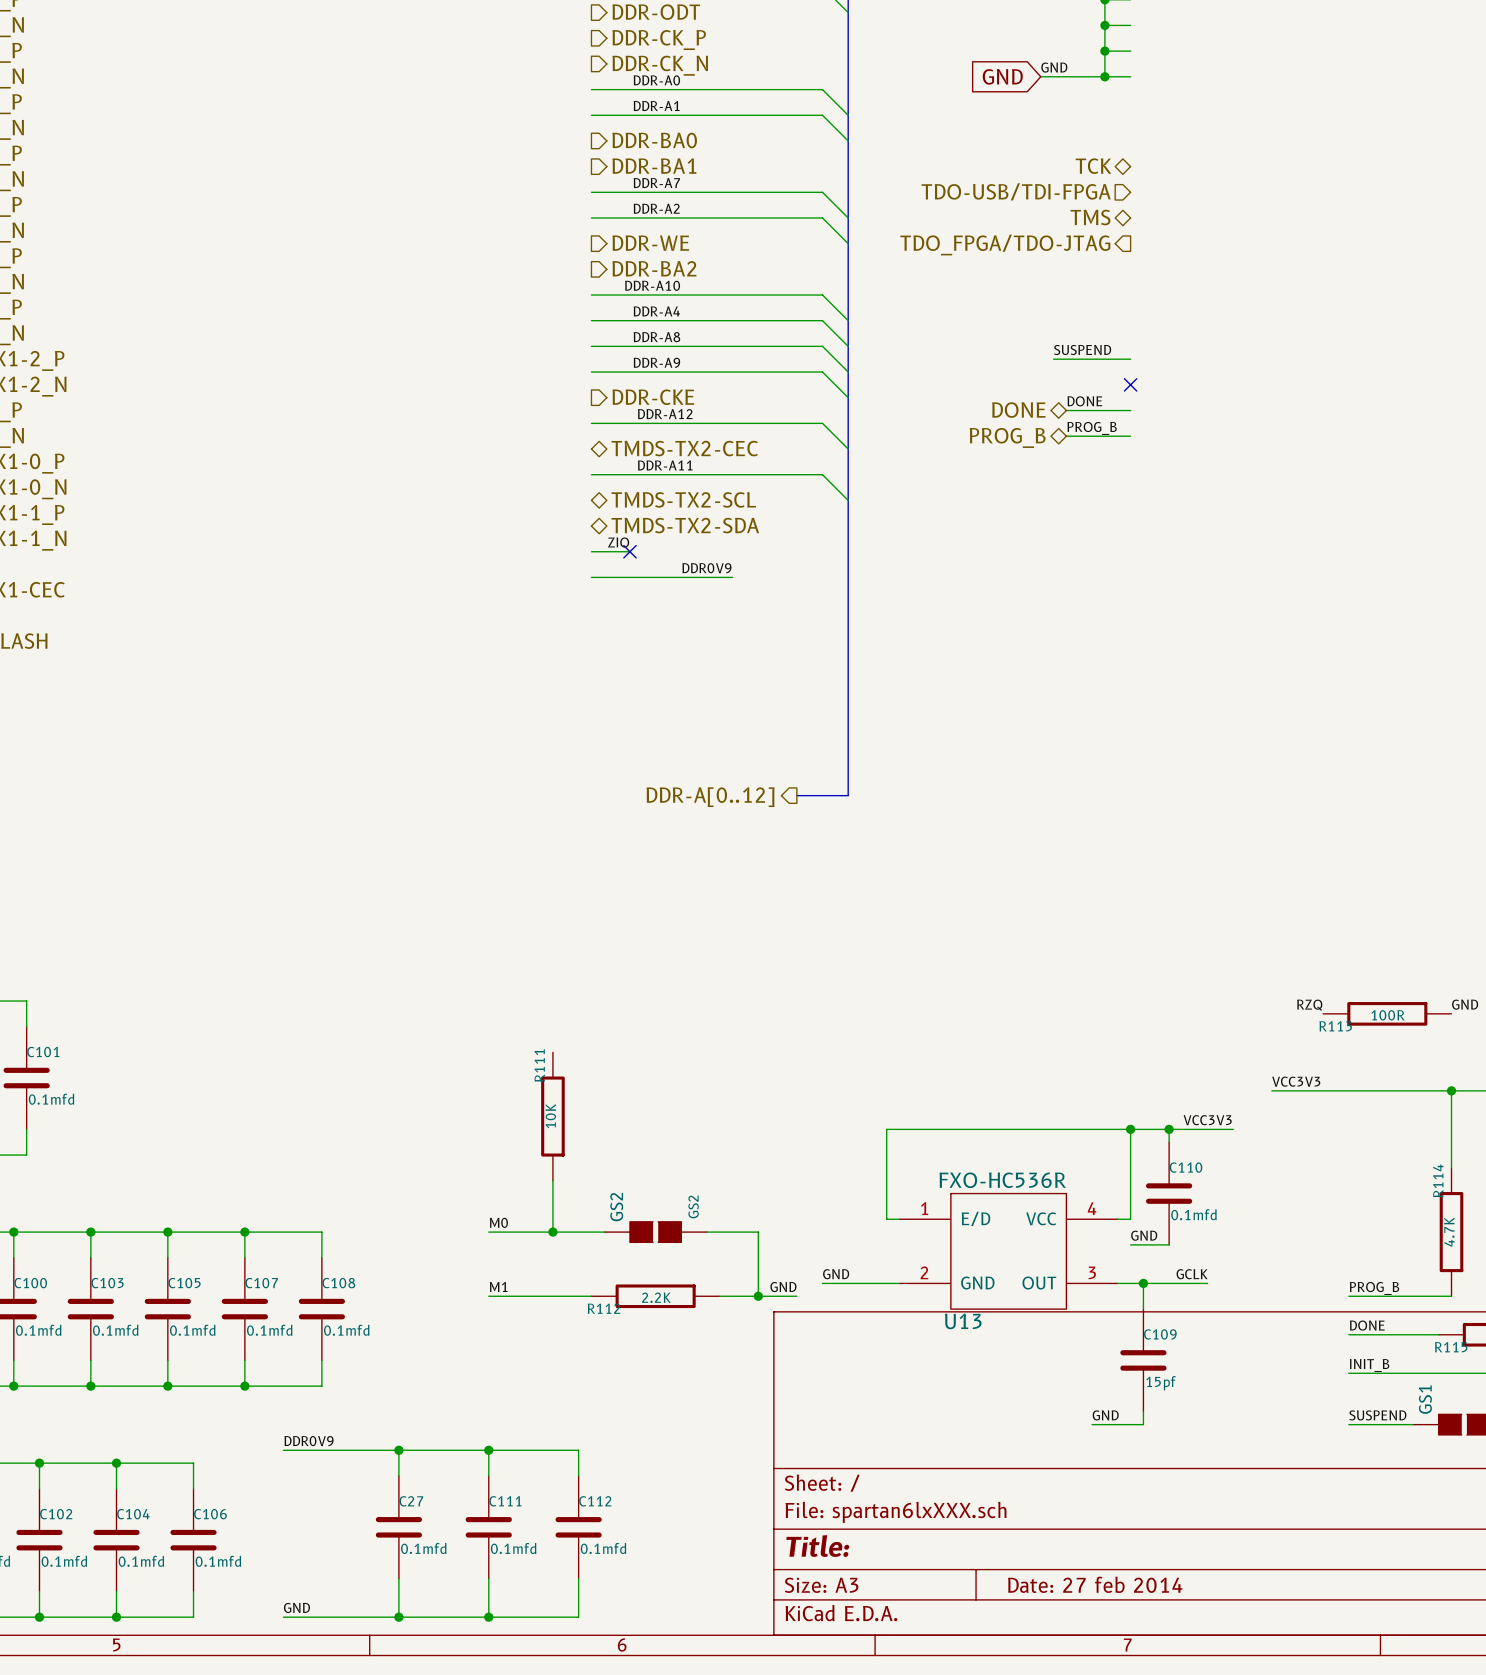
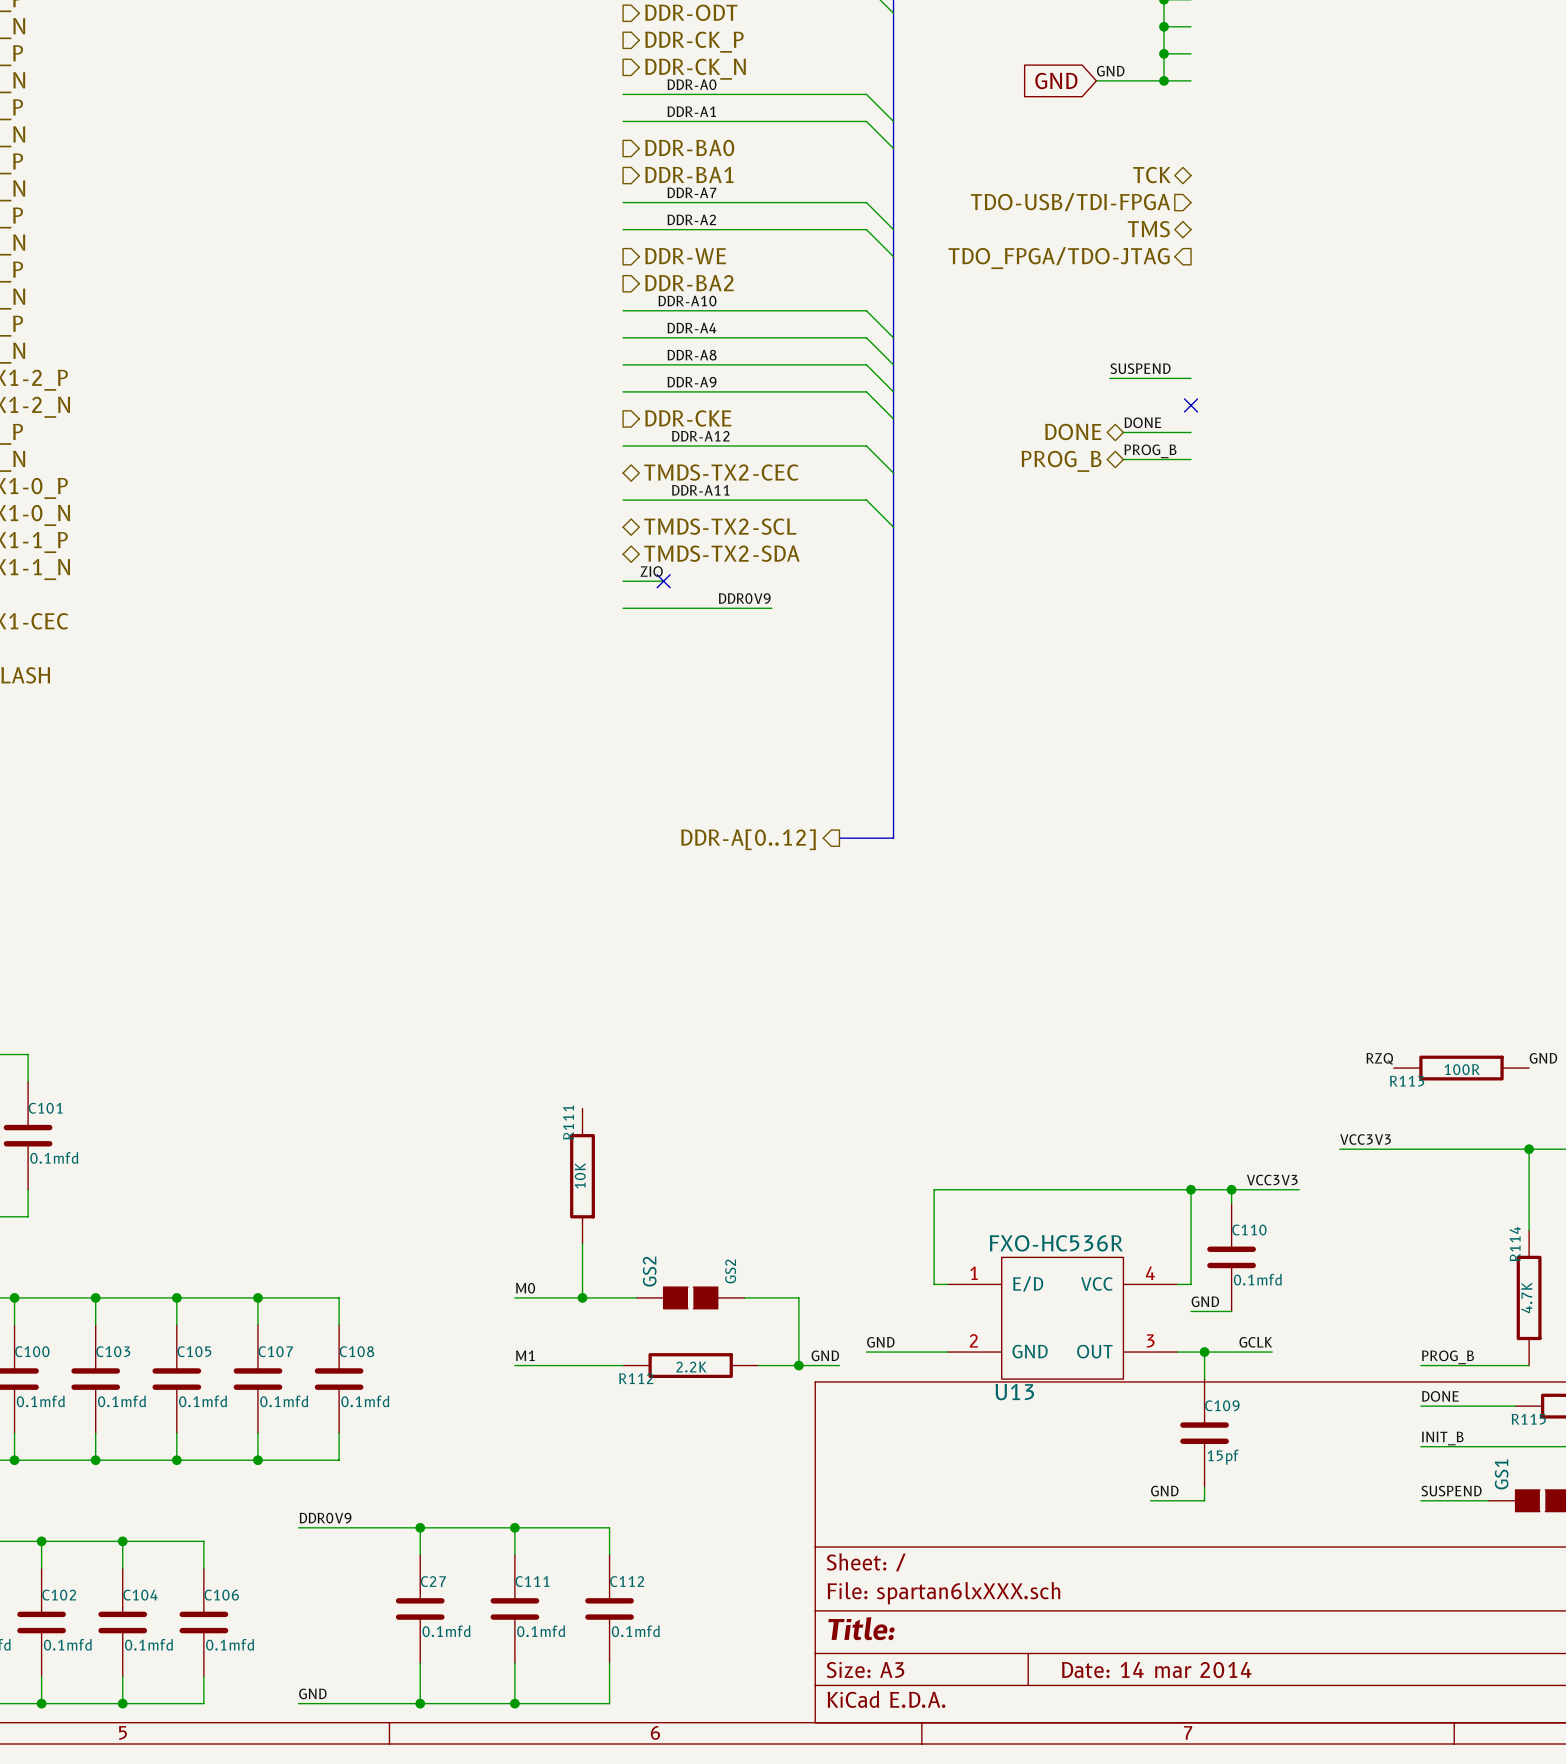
title block: Date: 27 feb 2014 (1095, 1584) -> Date: 14 mar 2014 (1156, 1670)

